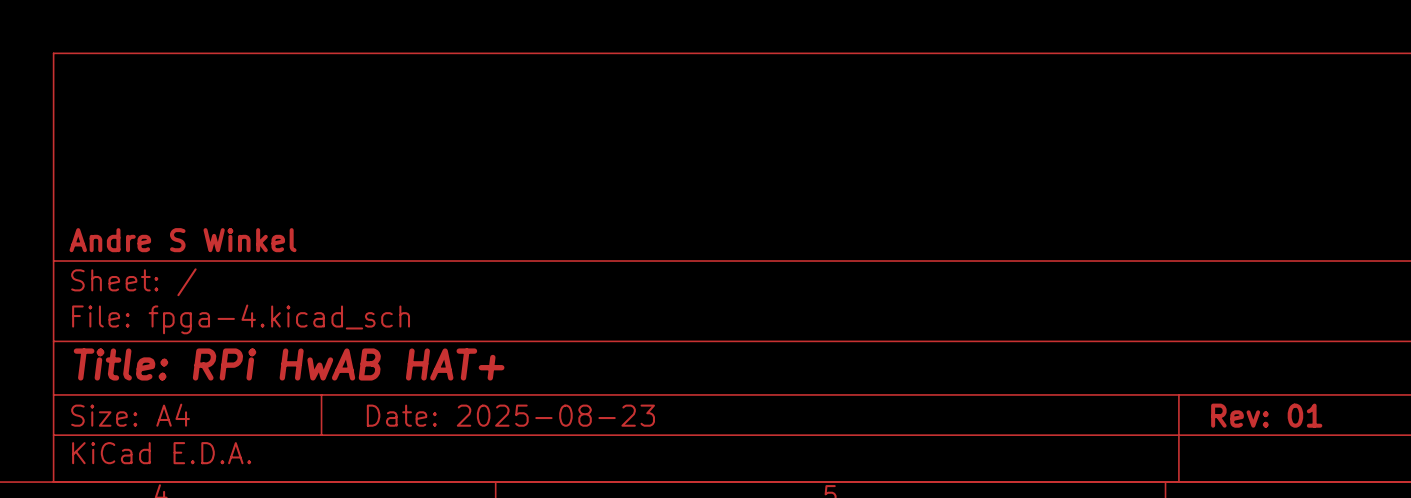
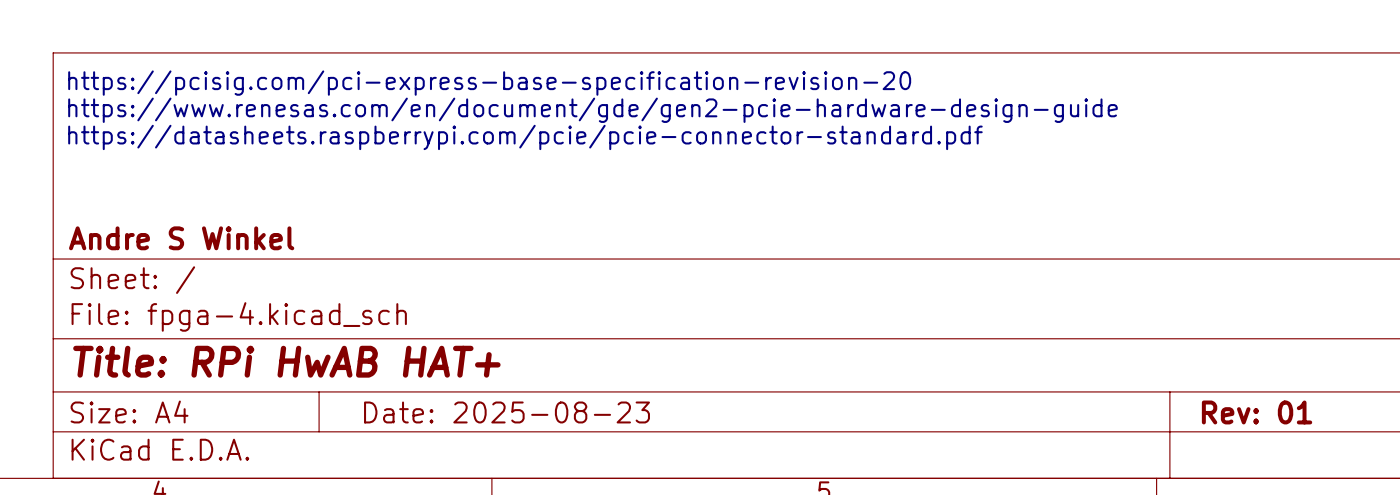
text: none -> https://pcisig.com/pci-express-base-specification-revision-20 (489, 83)
text: none -> https://www.renesas.com/en/document/gde/gen2-pcie-hardware-design-guide (592, 110)
text: none -> https://datasheets.raspberrypi.com/pcie/pcie-connector-standard.pdf (525, 137)

